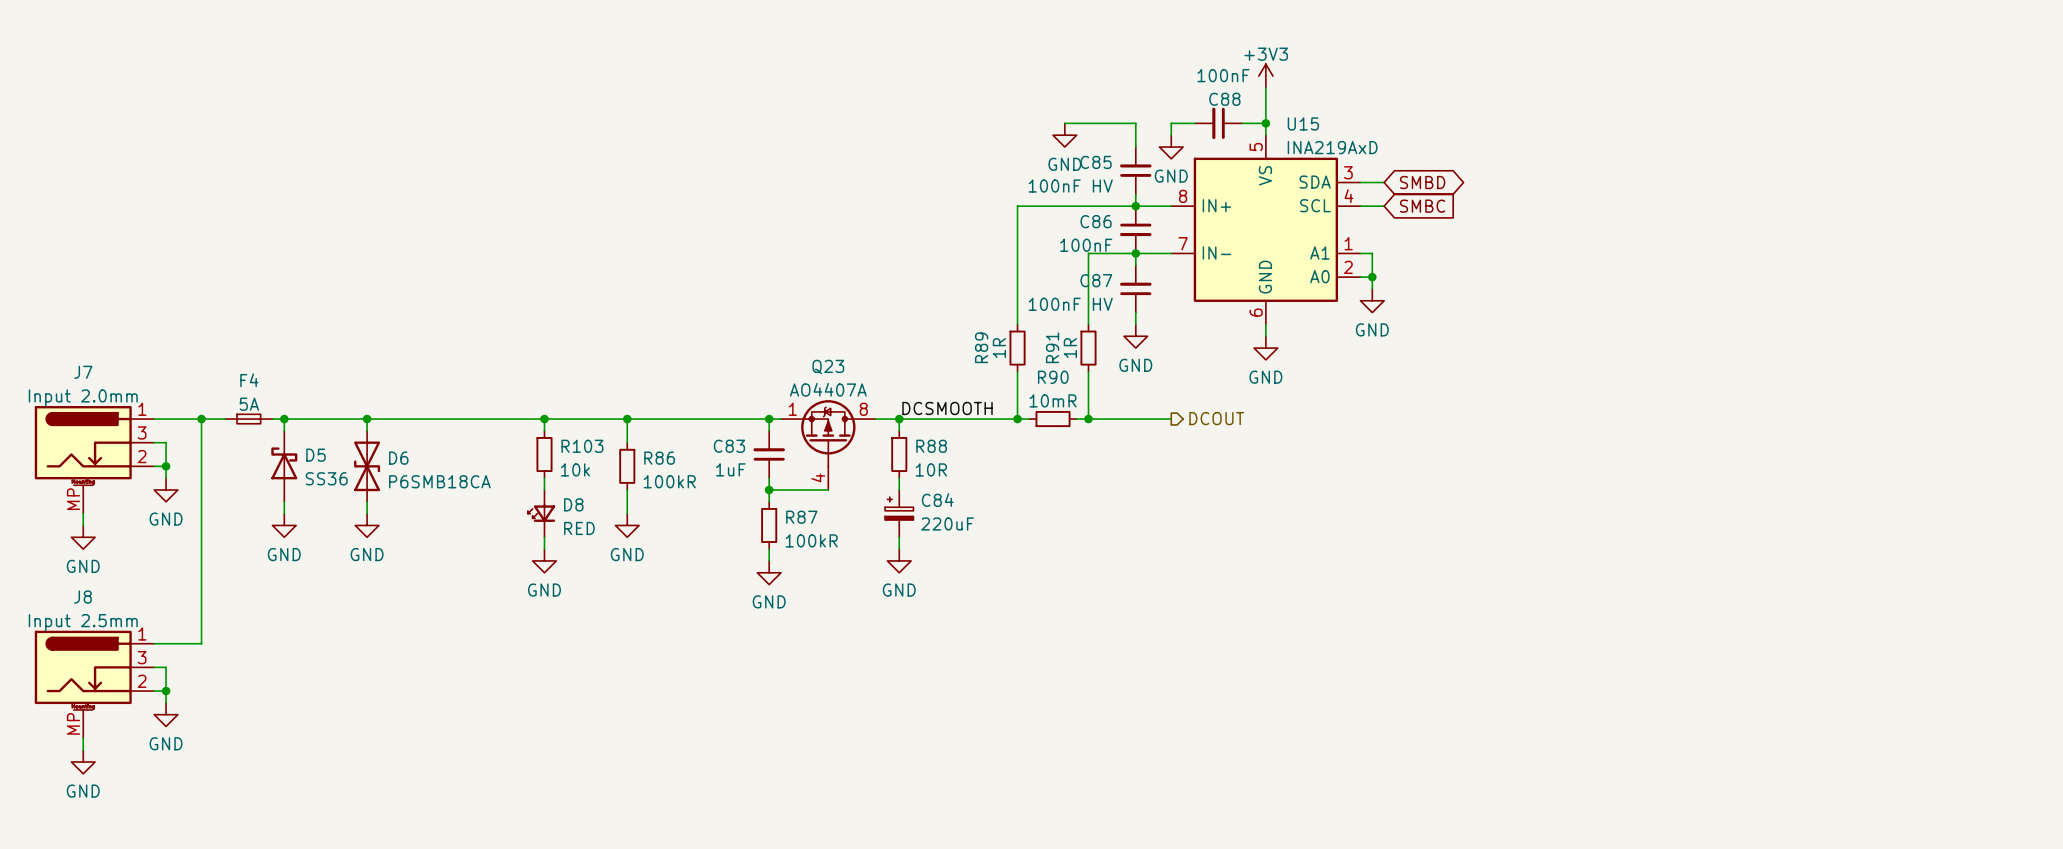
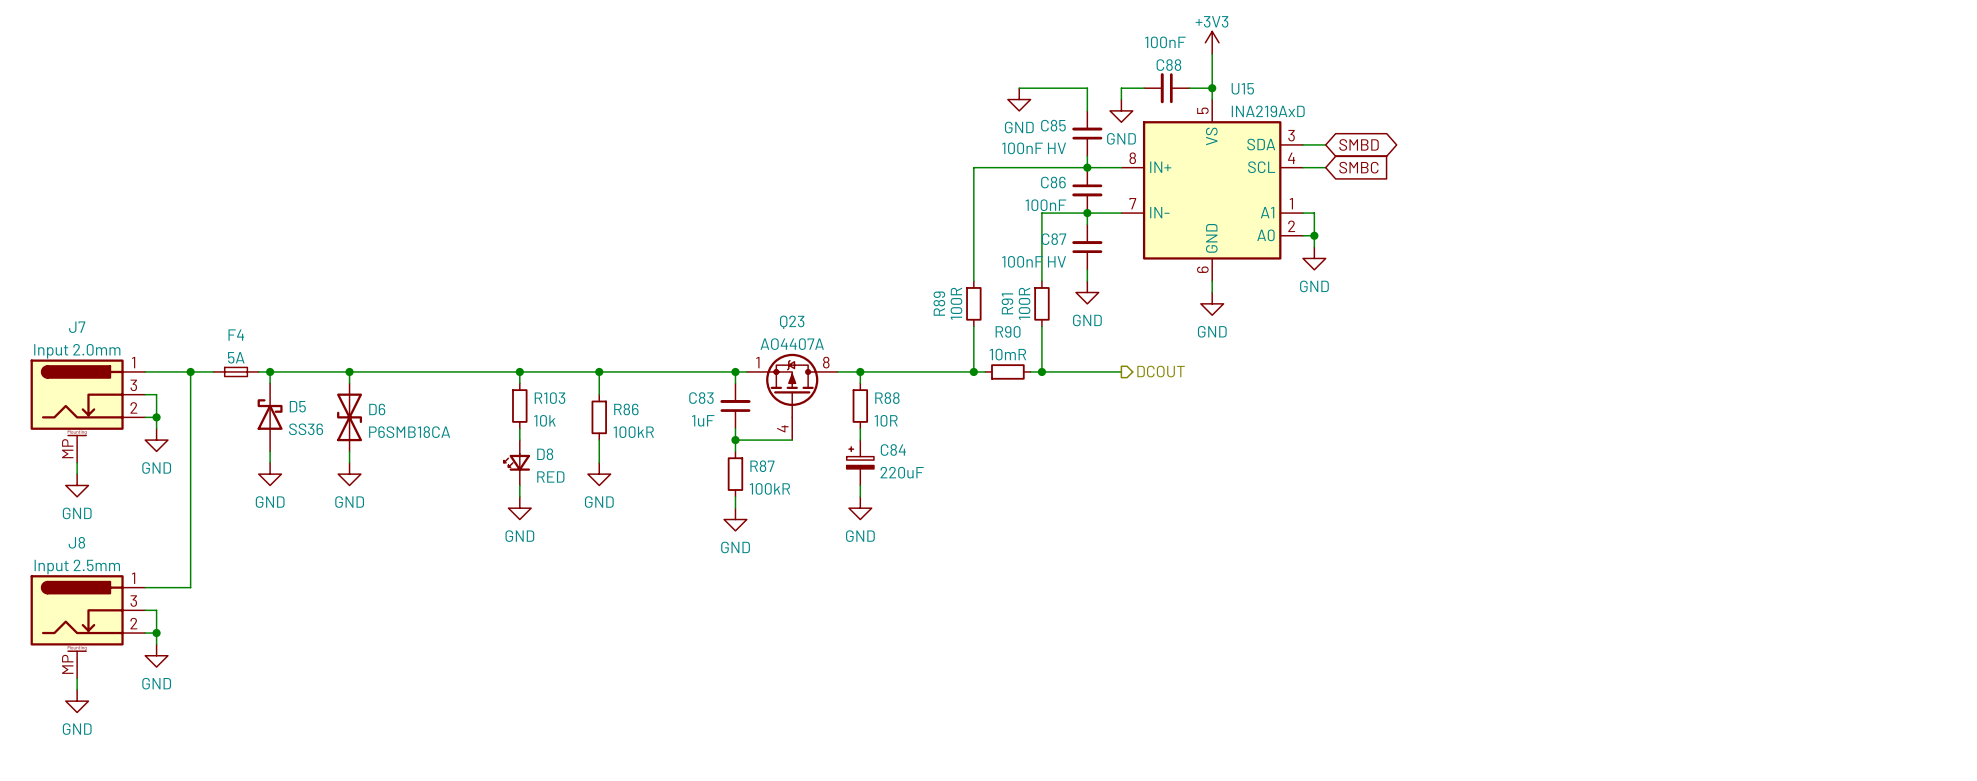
R89 value: 1R (999, 348) -> 100R (956, 303)
R91 value: 1R (1070, 348) -> 100R (1024, 303)
label: DCSMOOTH (947, 408) -> none

